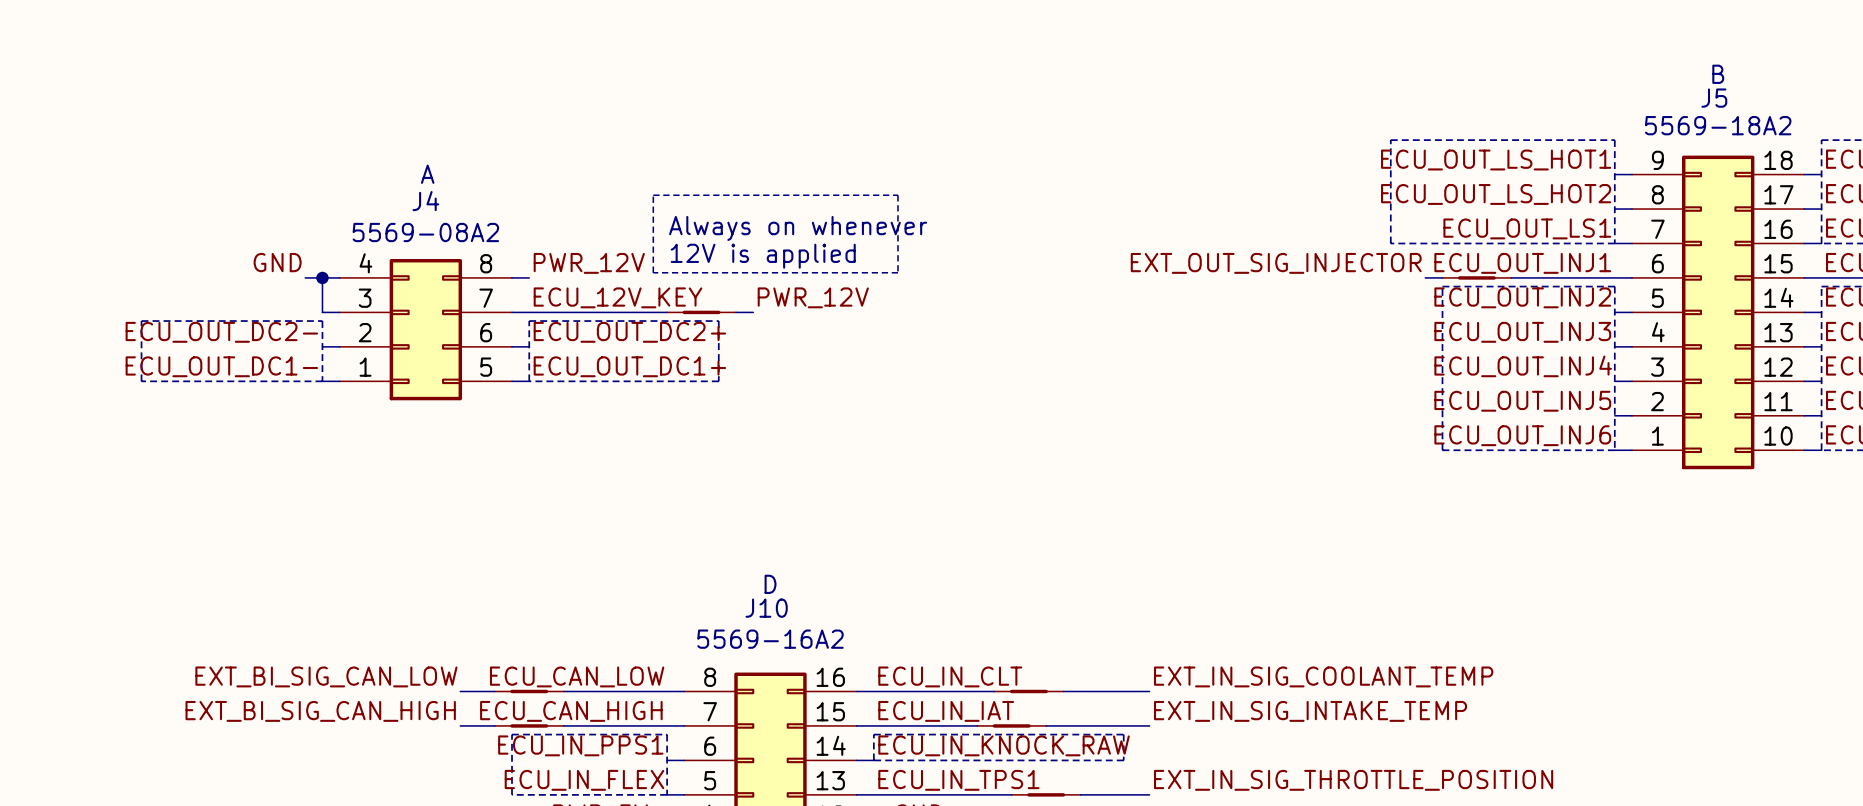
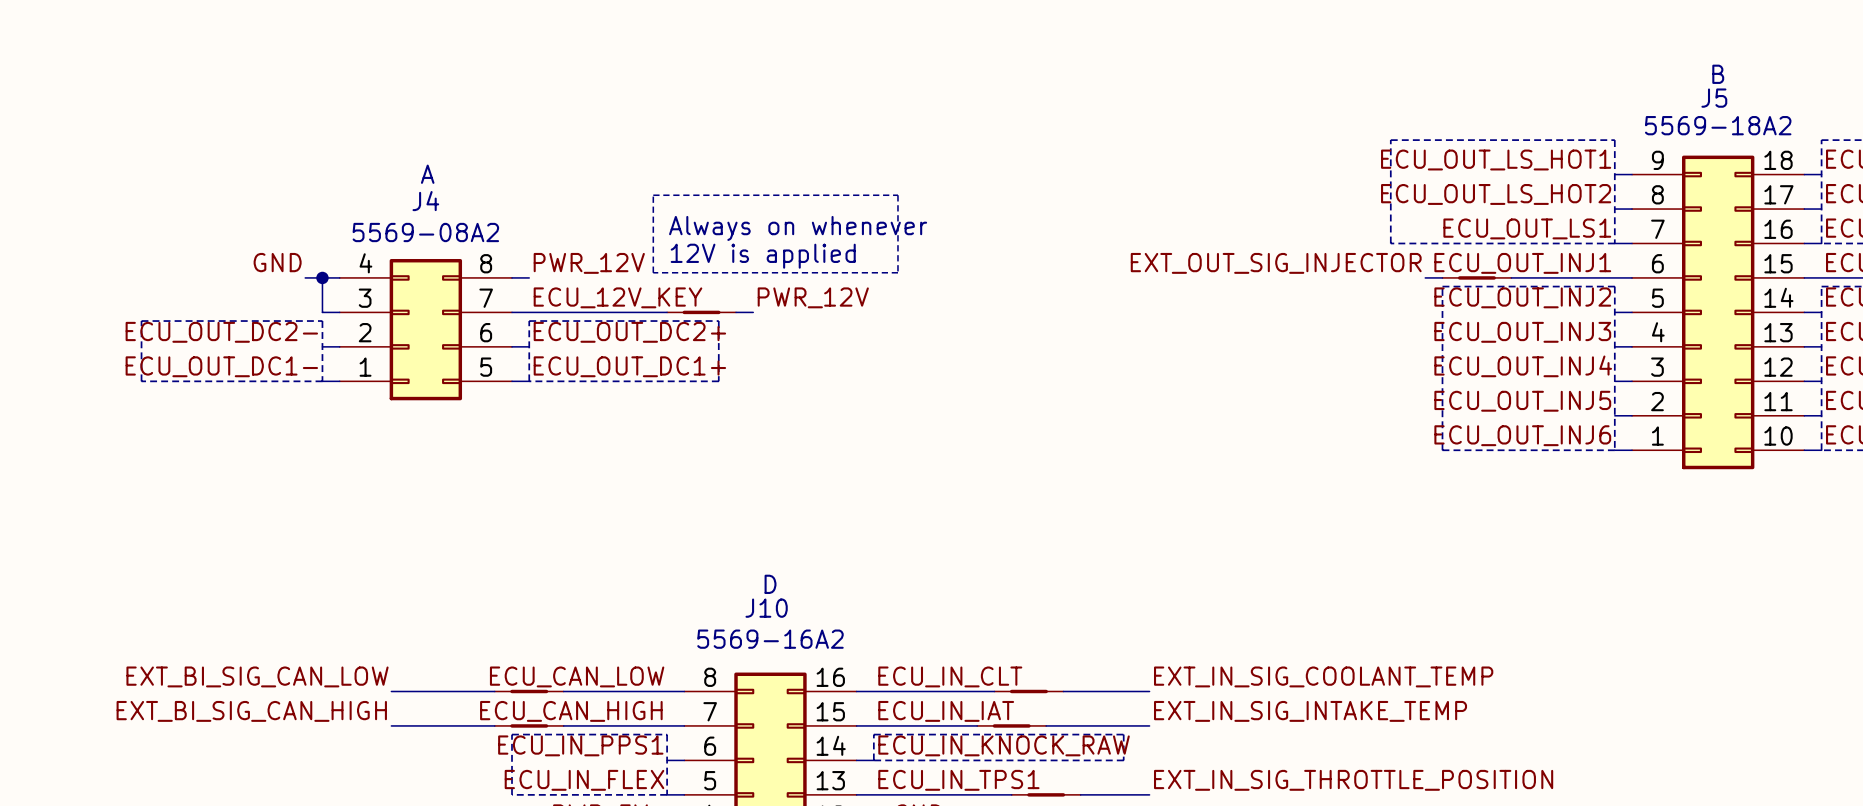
label position: EXT_BI_SIG_CAN_LOW (326, 676) -> EXT_BI_SIG_CAN_LOW (257, 676)
wire: none -> (391, 691) (460, 691)
label position: EXT_BI_SIG_CAN_HIGH (320, 711) -> EXT_BI_SIG_CAN_HIGH (251, 711)
wire: none -> (391, 725) (460, 725)

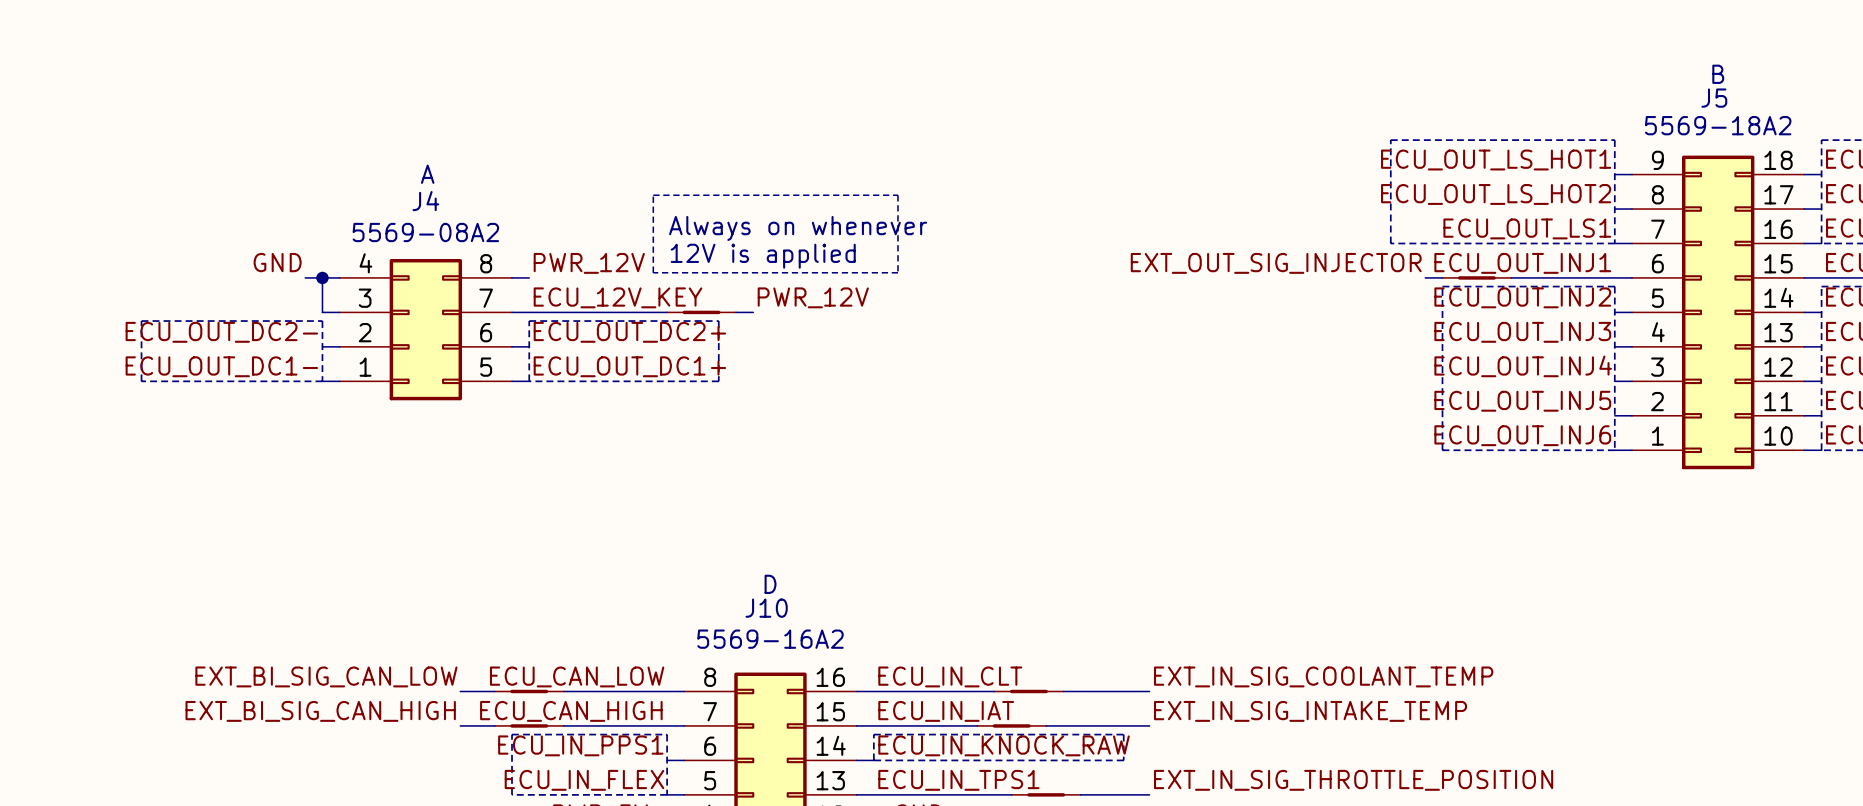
label position: EXT_BI_SIG_CAN_LOW (257, 676) -> EXT_BI_SIG_CAN_LOW (326, 676)
wire: (391, 691) (460, 691) -> none
label position: EXT_BI_SIG_CAN_HIGH (251, 711) -> EXT_BI_SIG_CAN_HIGH (320, 711)
wire: (391, 725) (460, 725) -> none

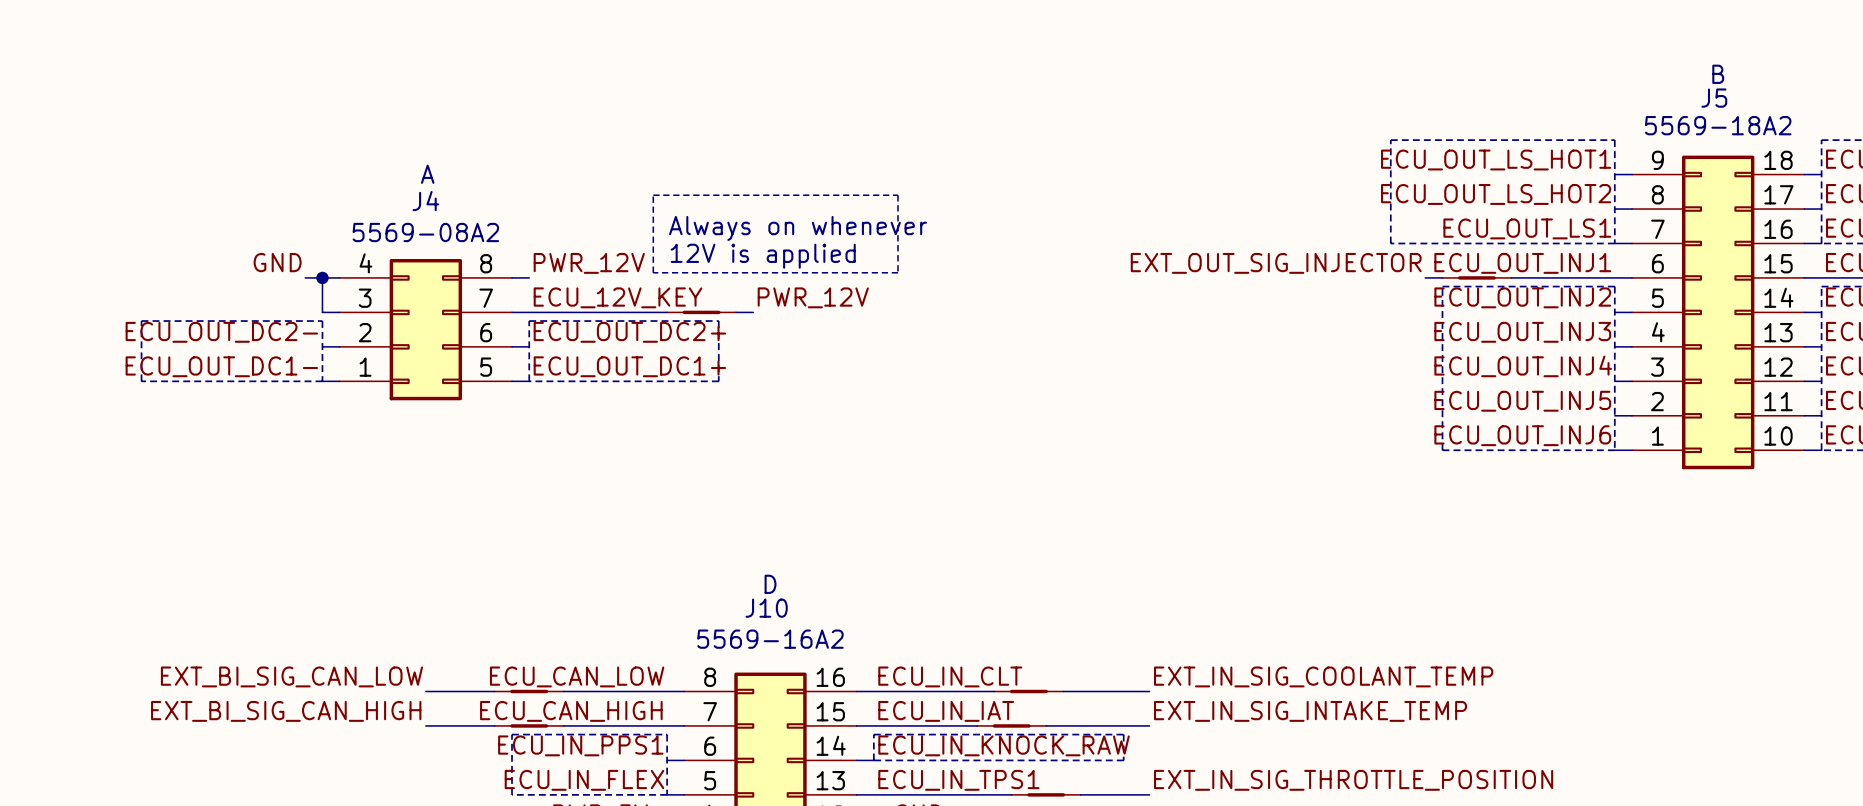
label position: EXT_BI_SIG_CAN_LOW (326, 676) -> EXT_BI_SIG_CAN_LOW (291, 676)
wire: none -> (425, 691) (460, 691)
label position: EXT_BI_SIG_CAN_HIGH (320, 711) -> EXT_BI_SIG_CAN_HIGH (286, 711)
wire: none -> (425, 725) (460, 725)

